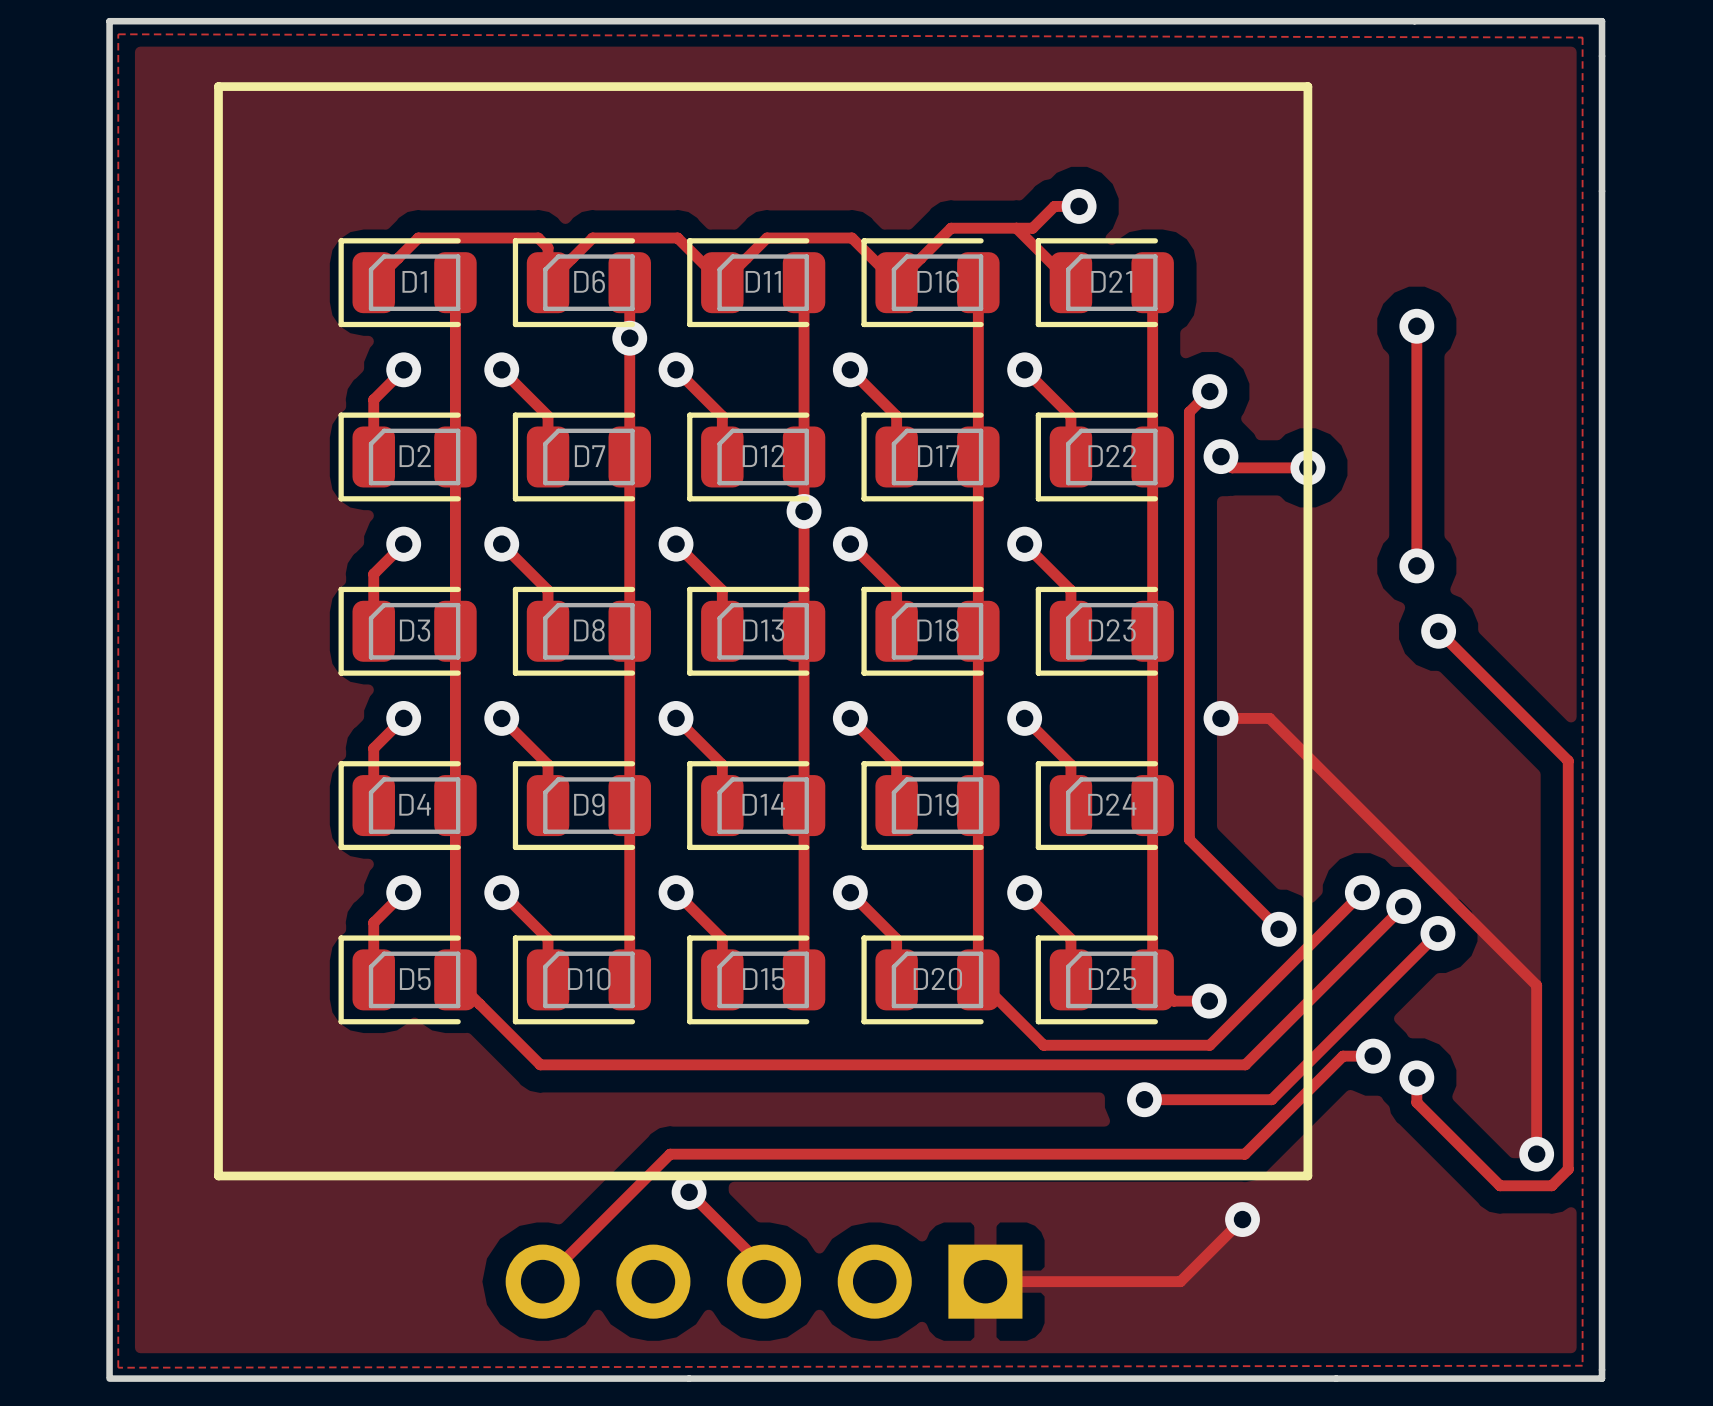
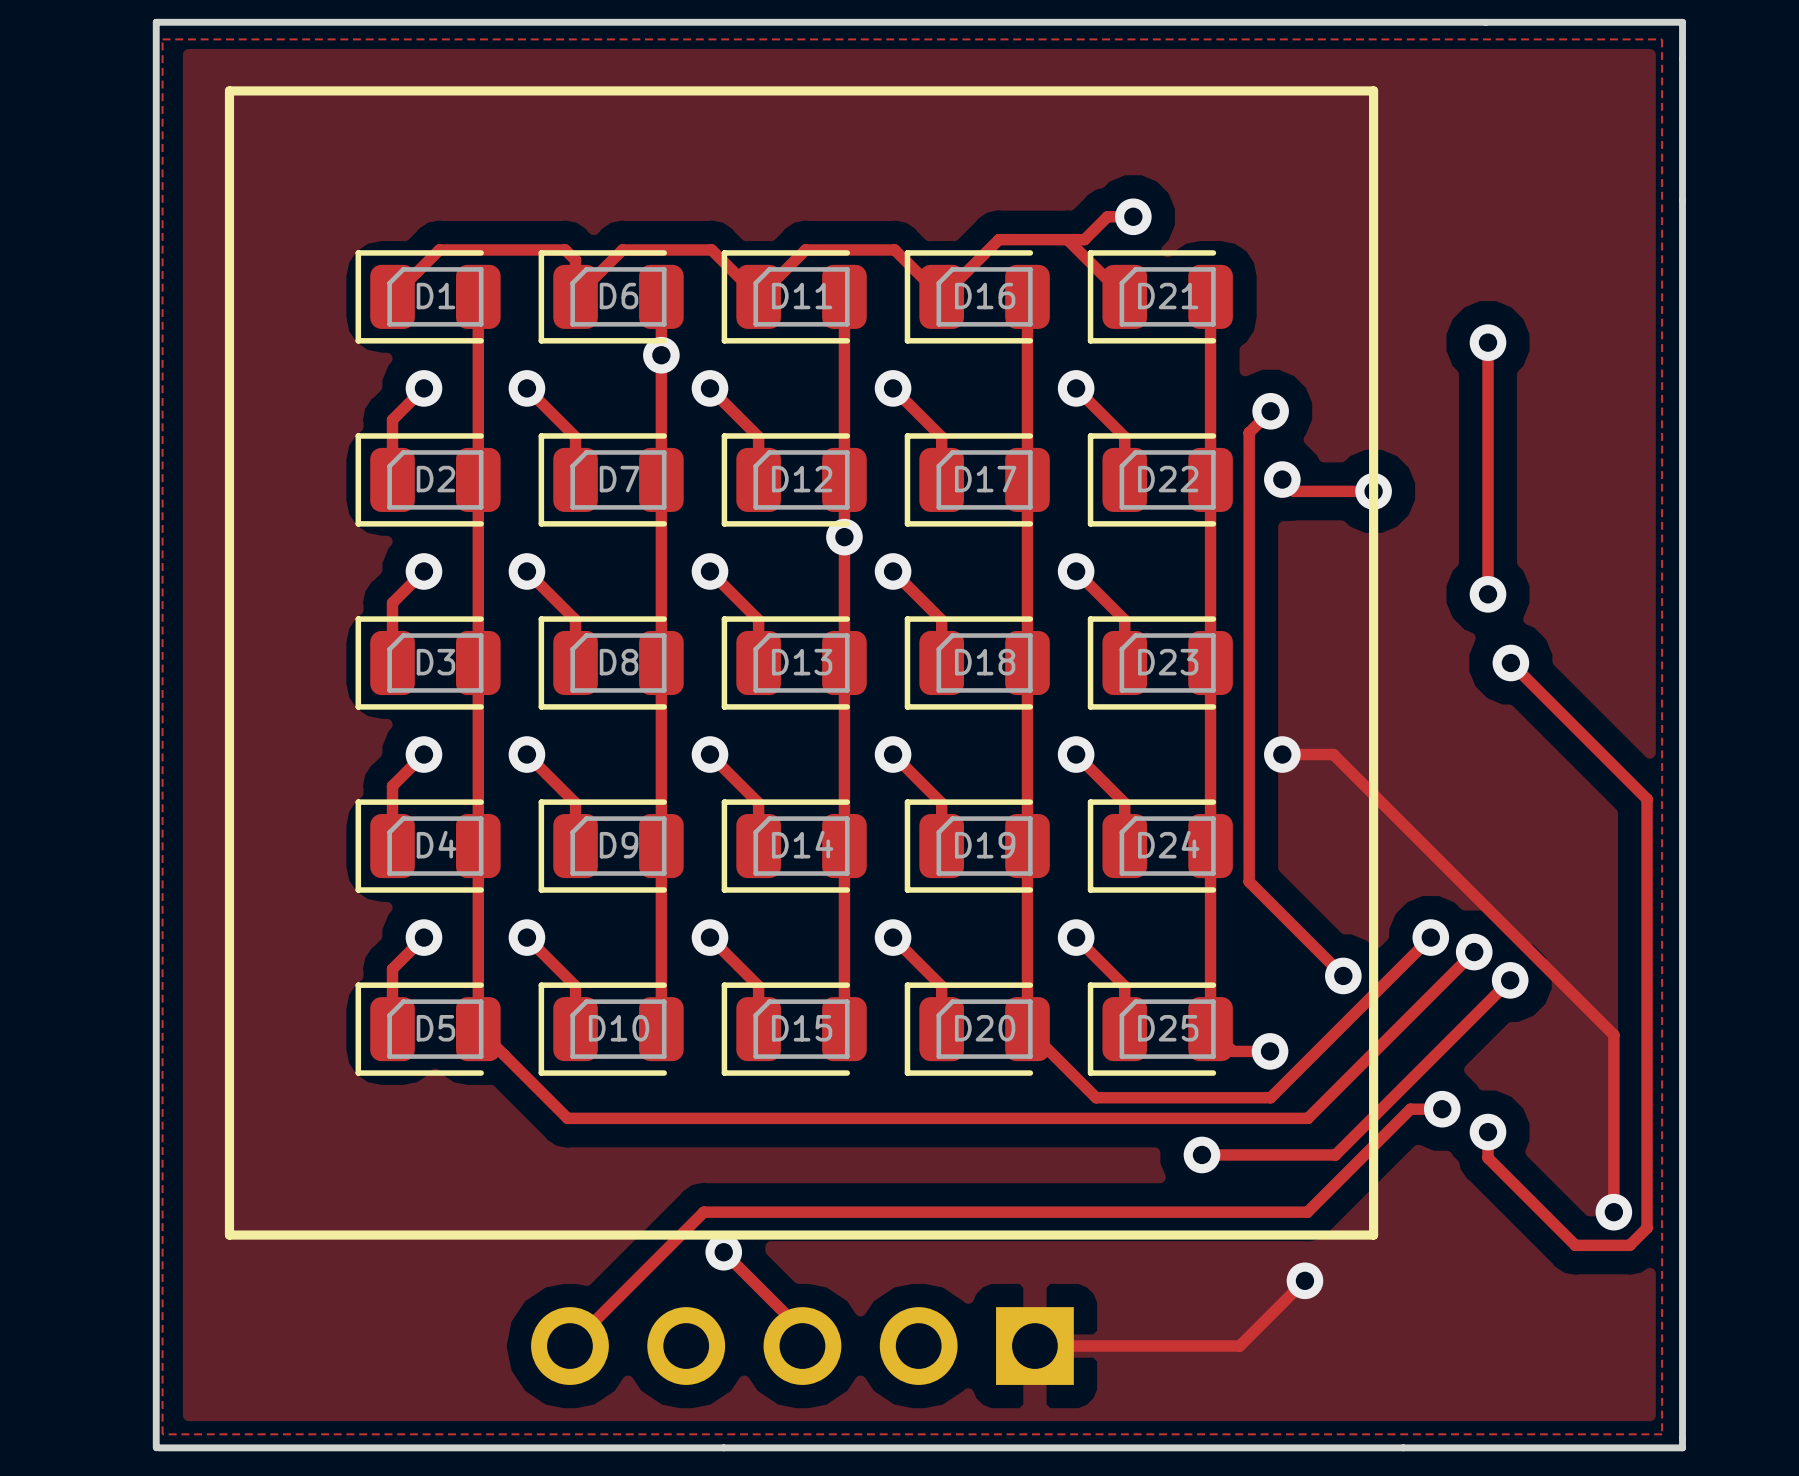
board edge: (148, 21) (109, 21) (109, 1376) -> (156, 22) (156, 1447)
zone outline: (1582, 37) (118, 34) (118, 1367) (1582, 1365) -> (1662, 39) (162, 39) (162, 1434) (1662, 1434)
board edge: (109, 1378) (150, 1378) -> none

